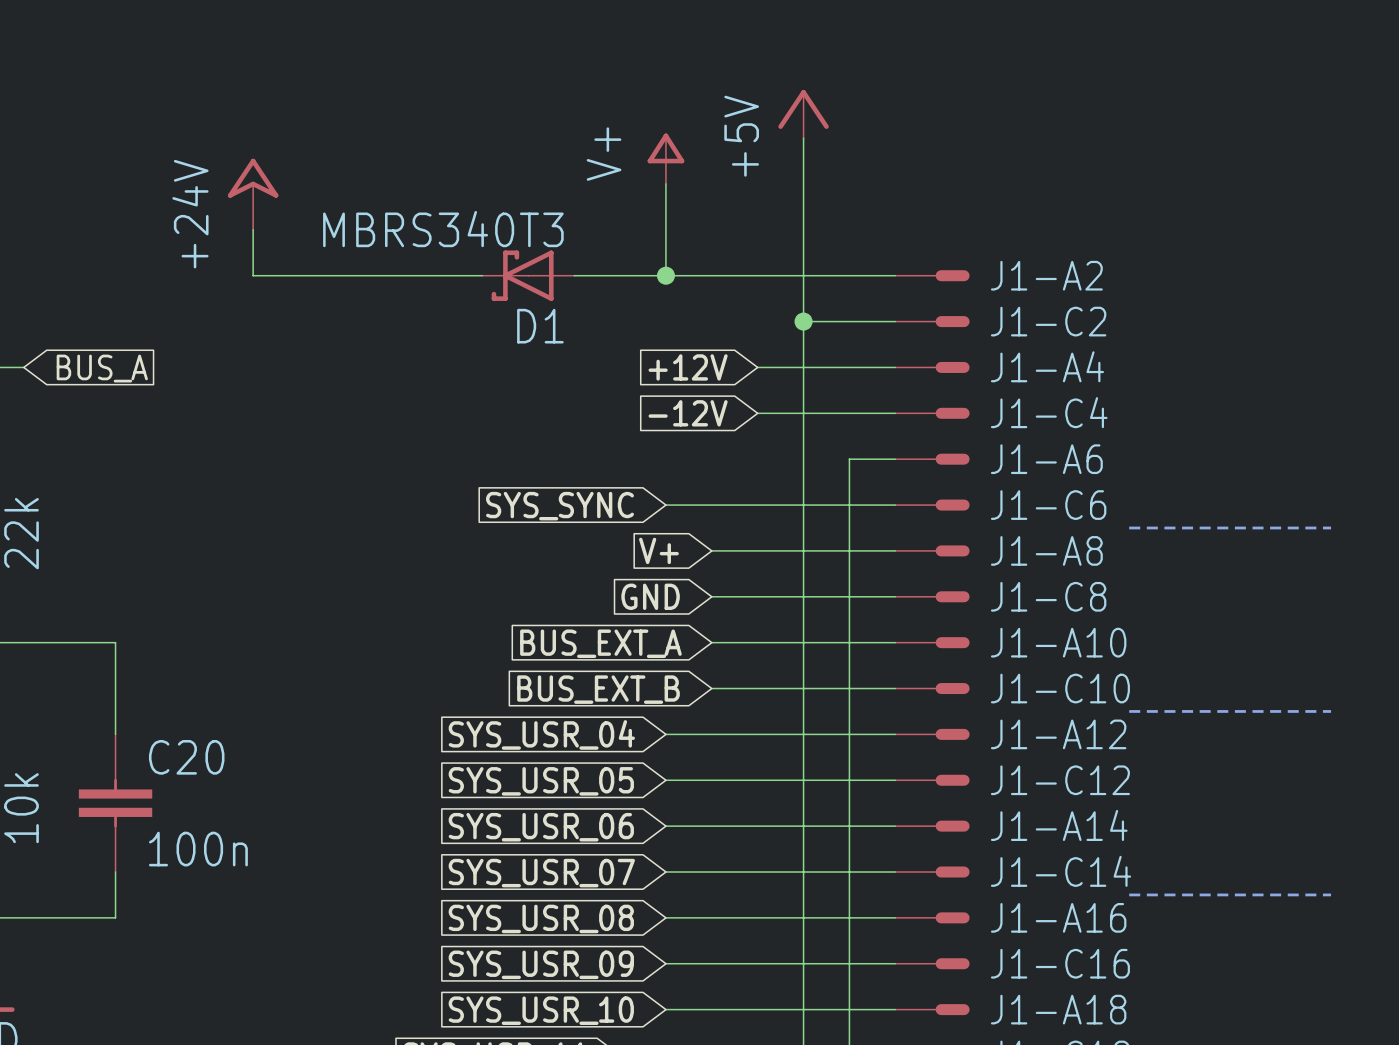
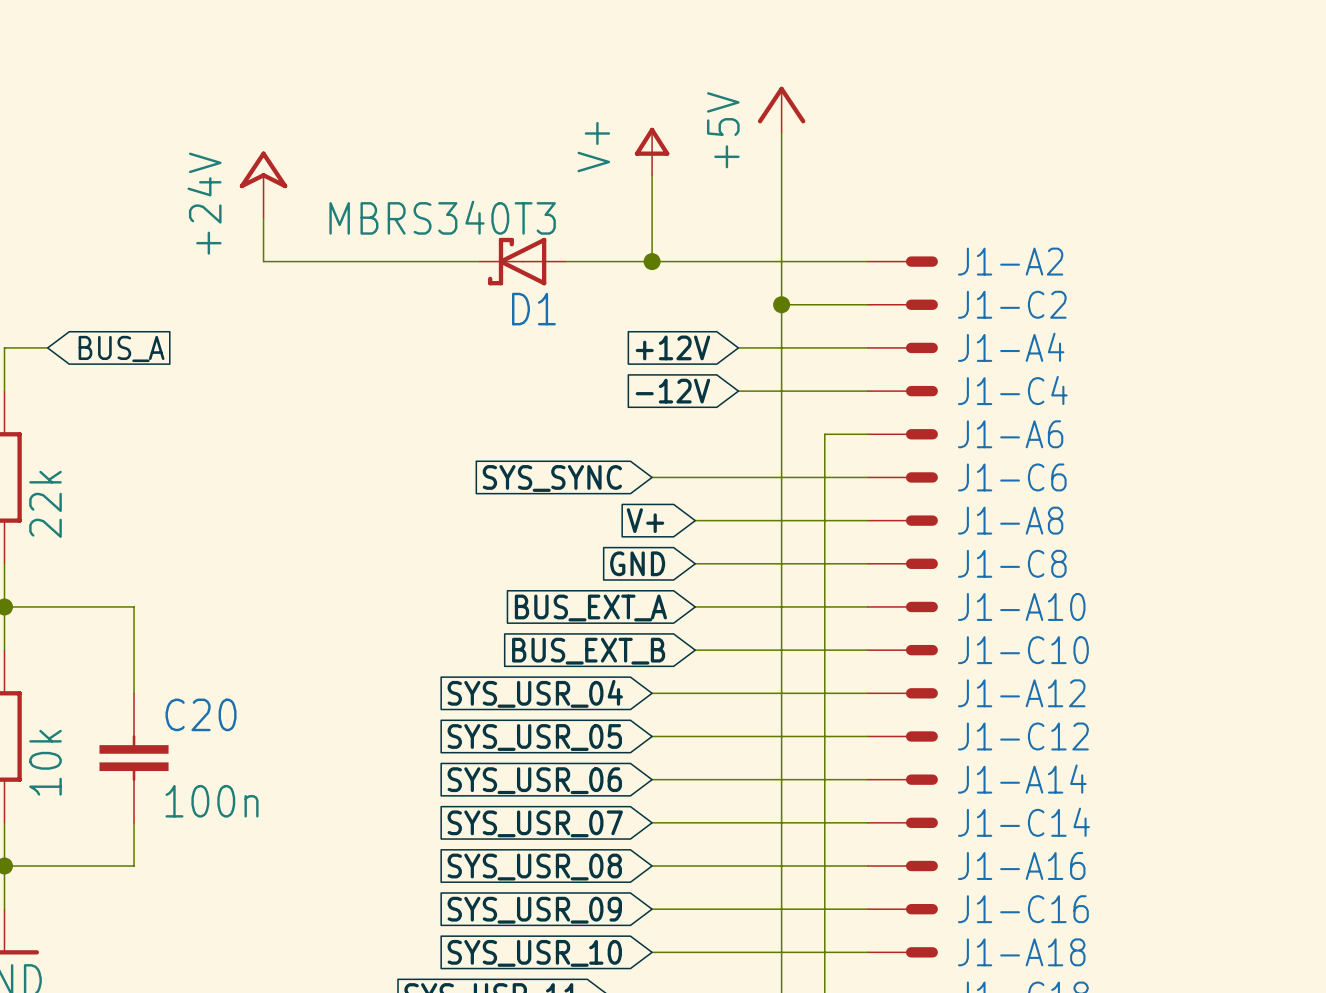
line: (1129, 527) (1331, 527) -> none
line: (1129, 711) (1331, 711) -> none
line: (1129, 894) (1331, 894) -> none

